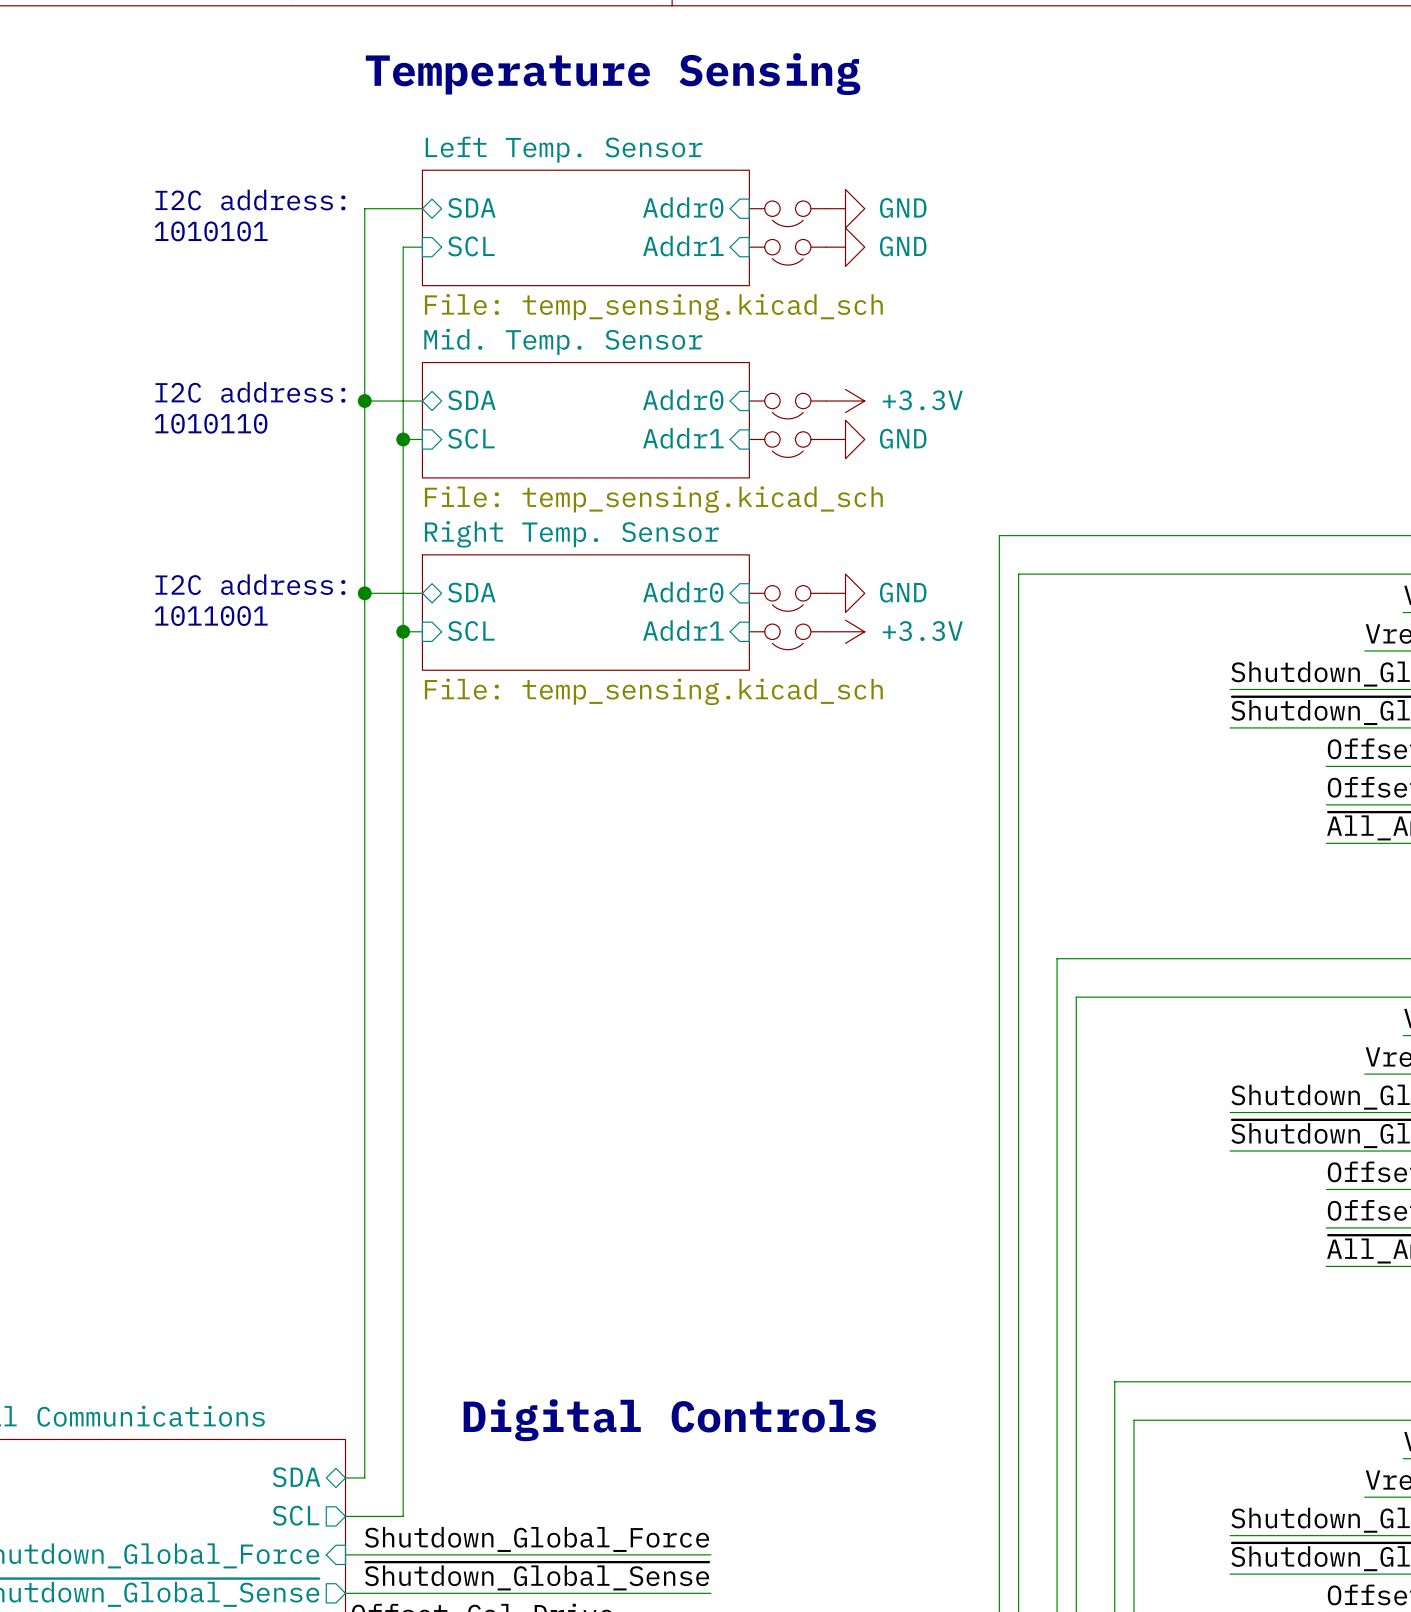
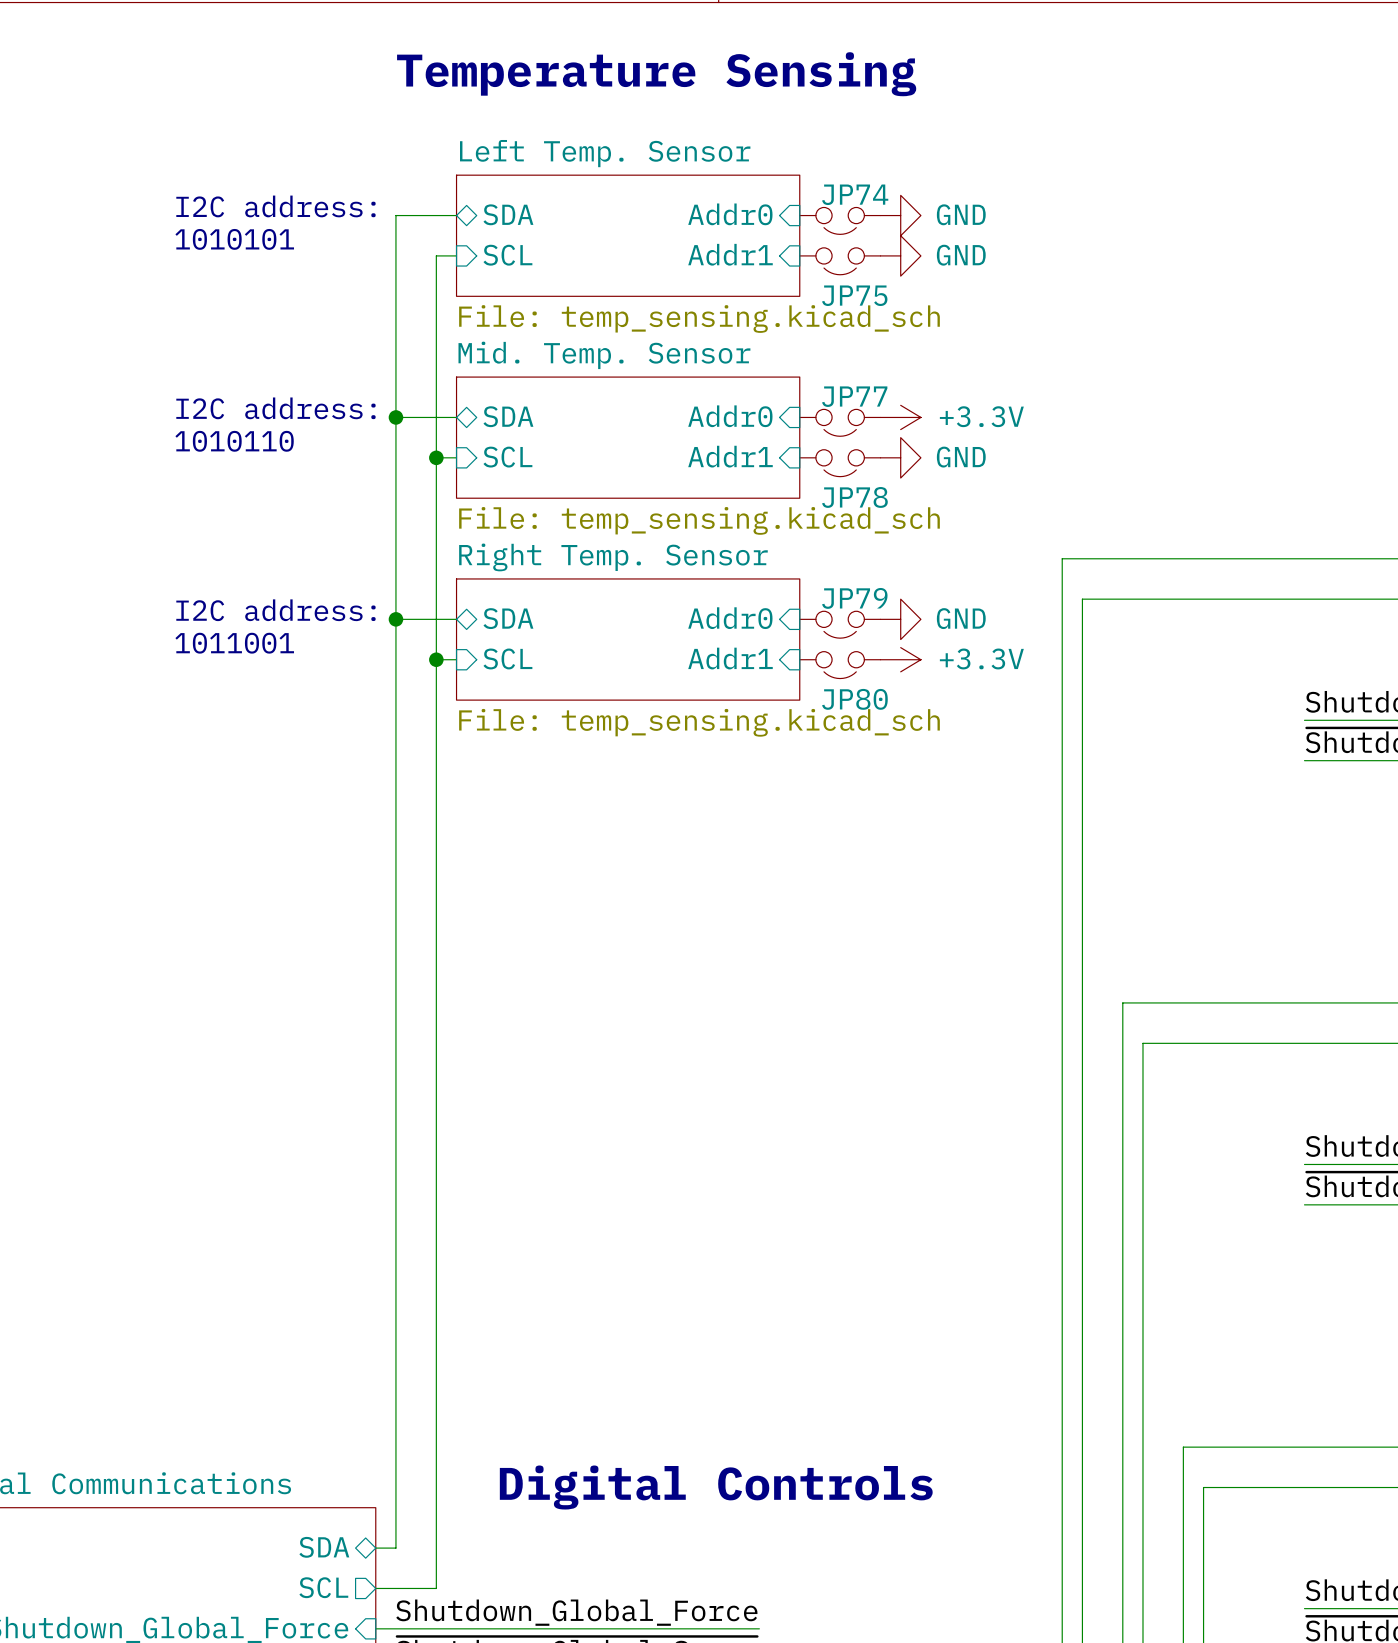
JP74 name: none -> JP74 (855, 194)
JP75 name: none -> JP75 (854, 295)
JP77 name: none -> JP77 (854, 396)
JP78 name: none -> JP78 (854, 497)
JP79 name: none -> JP79 (854, 598)
JP80 name: none -> JP80 (854, 699)

